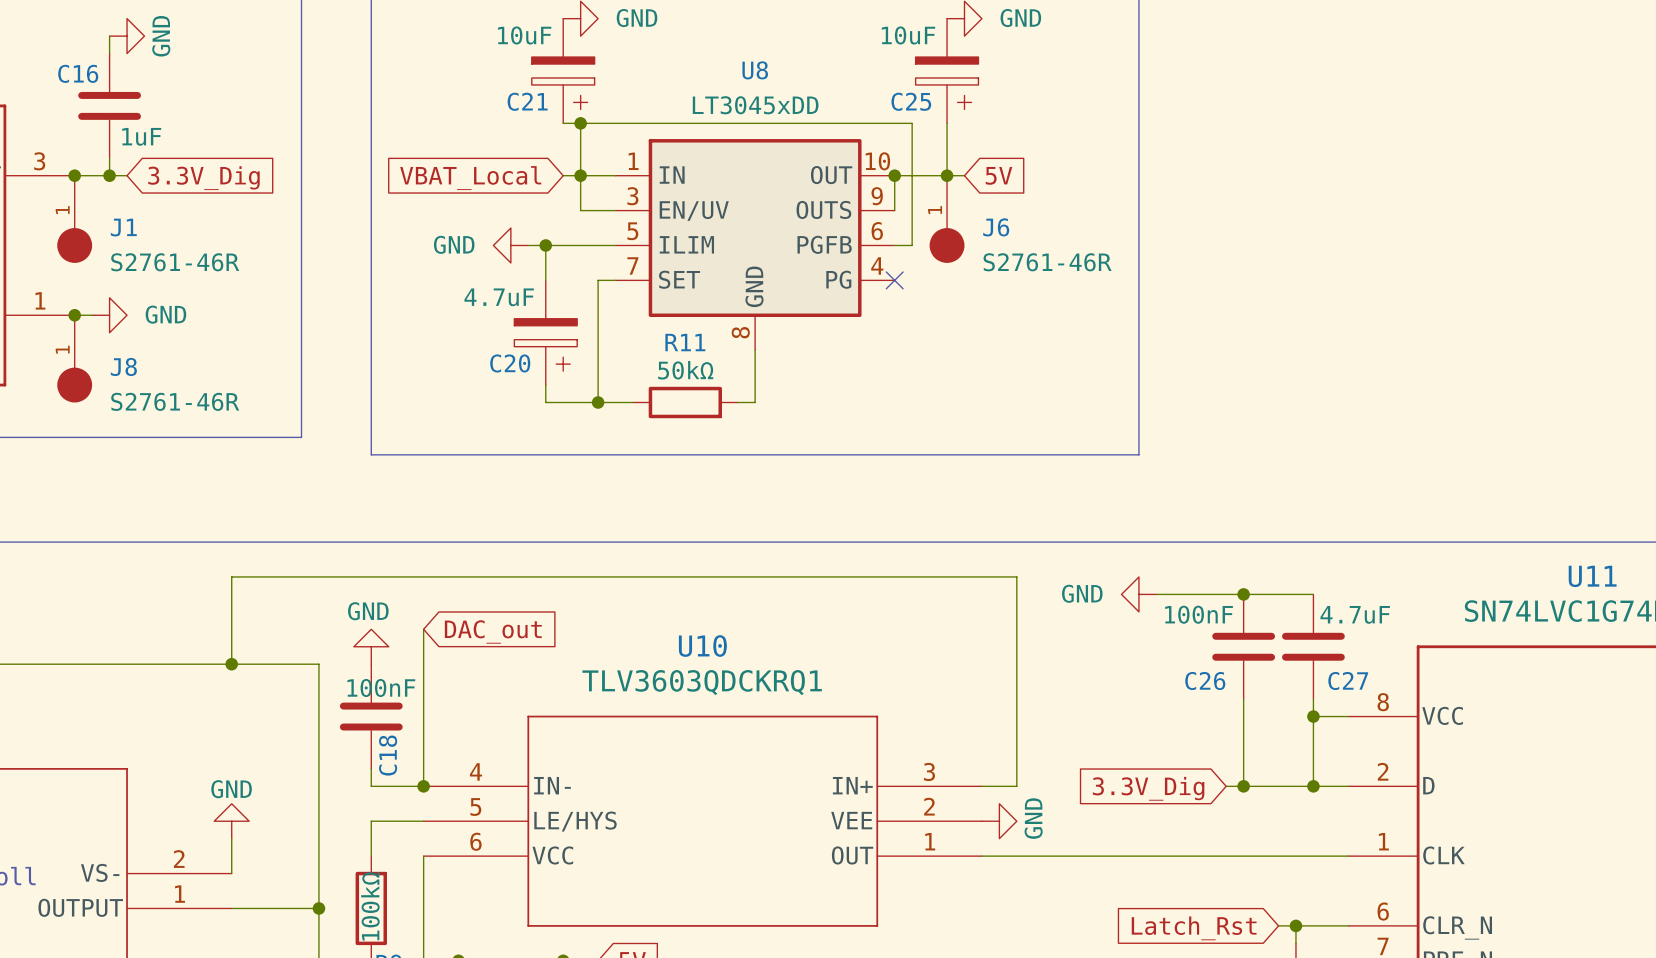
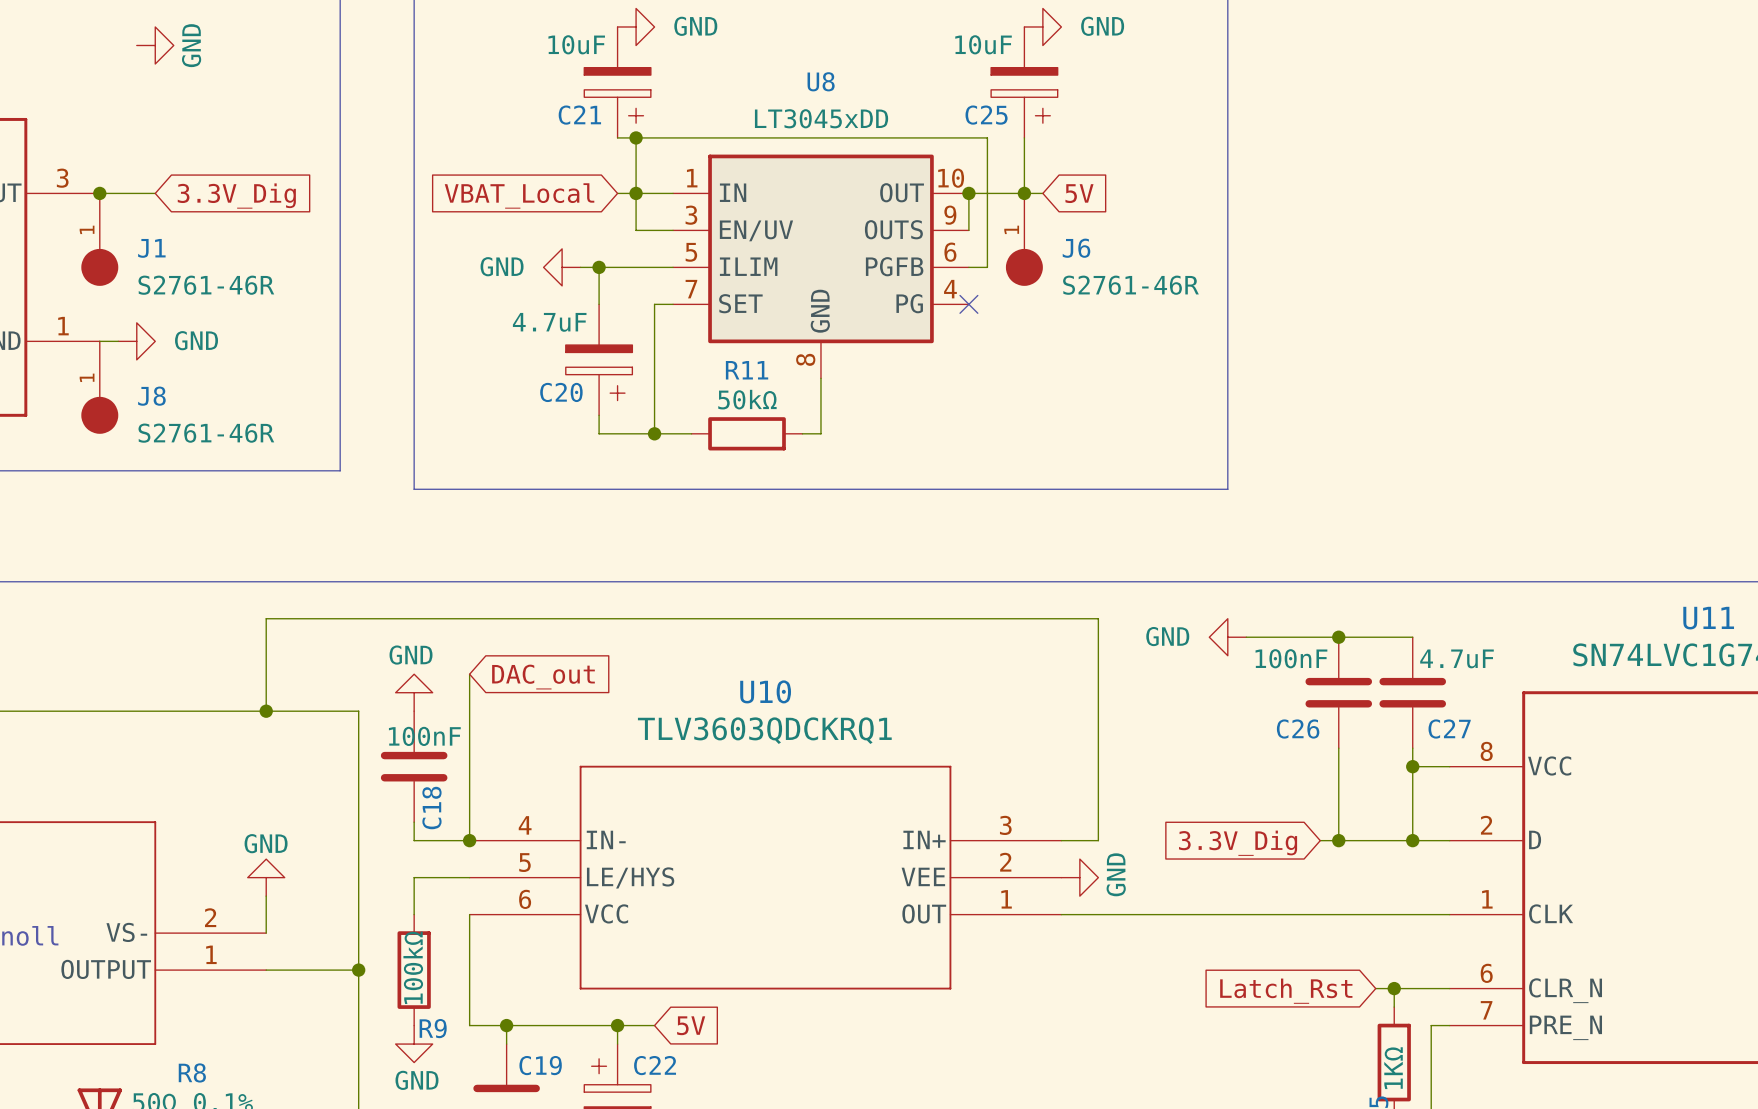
wire: (109, 36) (109, 53) -> none
C16: 1uF (109, 105) -> none
wire: (109, 158) (109, 175) -> none
junction: (109, 175) -> none
junction: (74, 315) -> none

